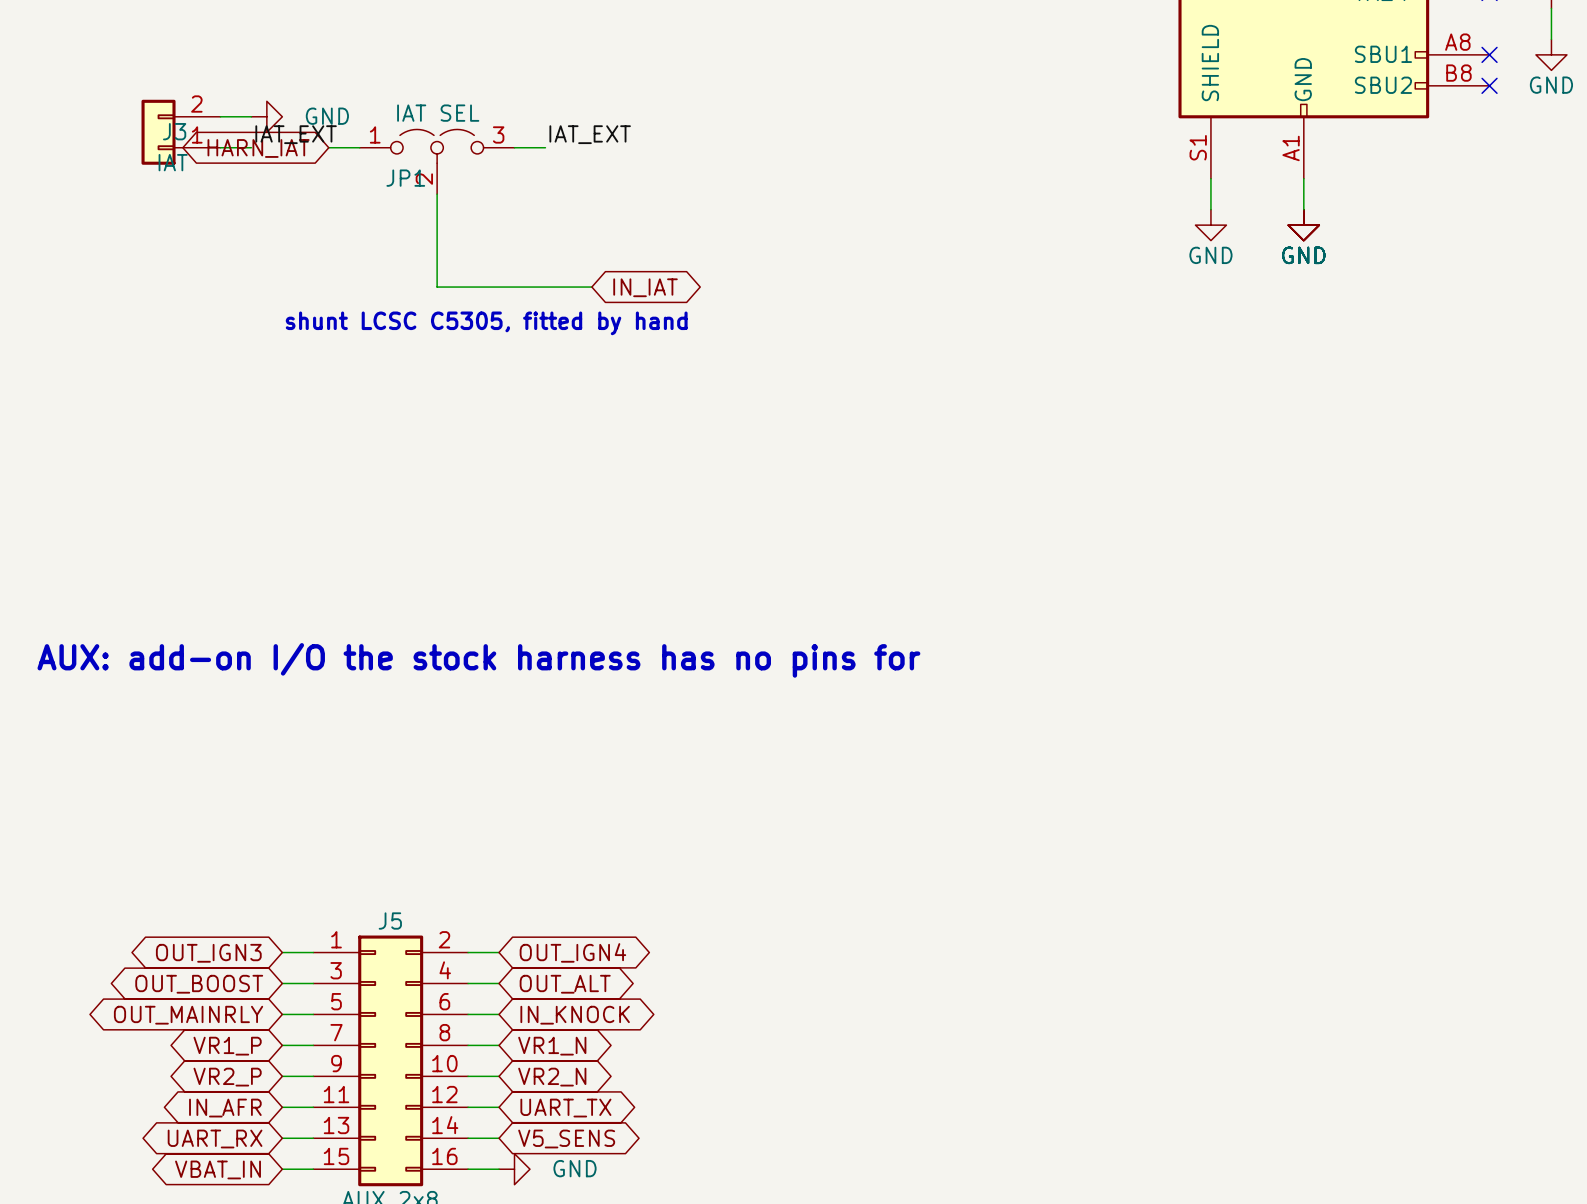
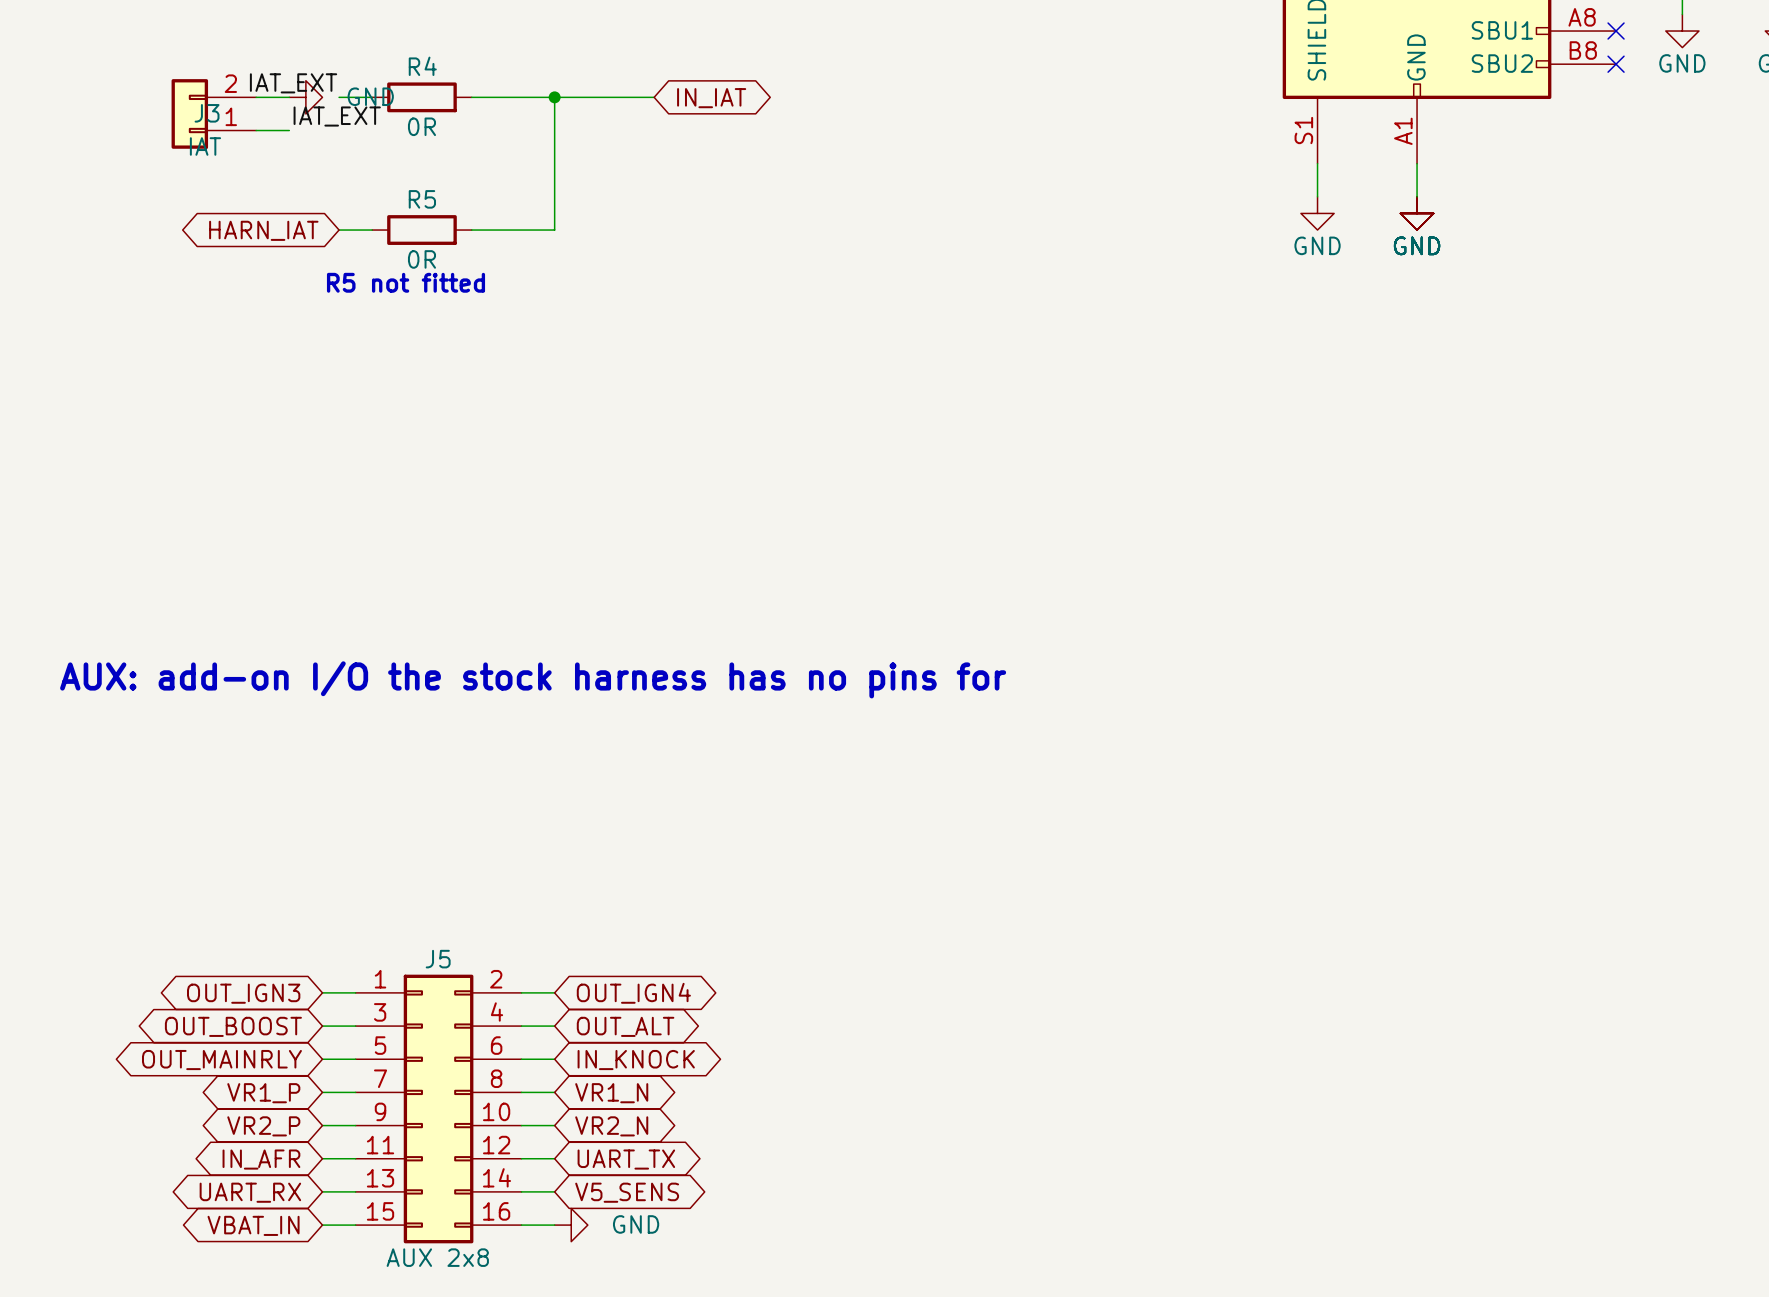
R4: none -> 0R (421, 97)
wire: none -> (471, 97) (654, 97)
wire: none -> (554, 97) (554, 230) (471, 230)
junction: none -> (554, 97)
label position: IAT_EXT (590, 134) -> IAT_EXT (293, 83)
wire: (328, 147) (359, 147) -> (339, 97) (372, 97)
wire: (514, 147) (545, 147) -> (339, 230) (372, 230)
global label position: HARN_IAT (258, 148) -> HARN_IAT (263, 230)
JP1: IAT SEL (437, 161) -> none
wire: (437, 194) (437, 287) (591, 287) -> none
R5: none -> 0R (421, 230)
global label position: IN_IAT (645, 287) -> IN_IAT (711, 98)
text: none -> R5 not fitted (406, 282)
text: shunt LCSC C5305, fitted by hand (486, 323) -> none

